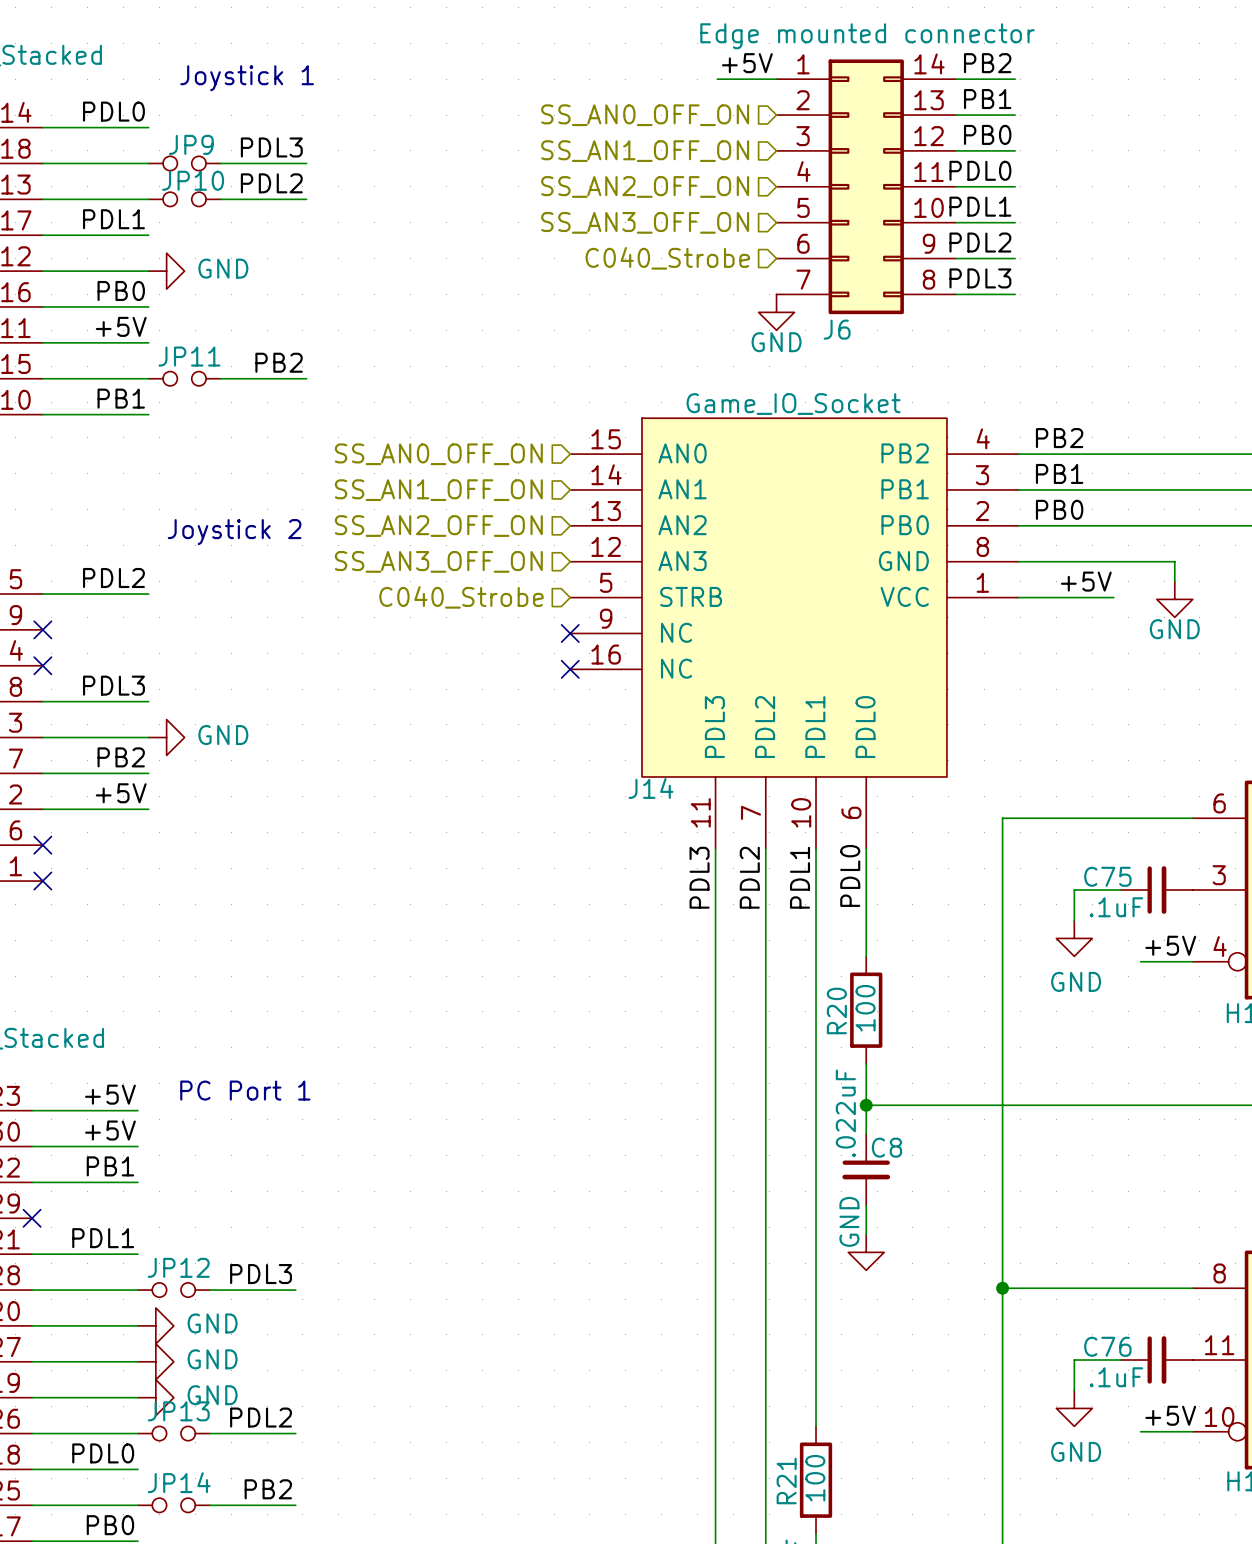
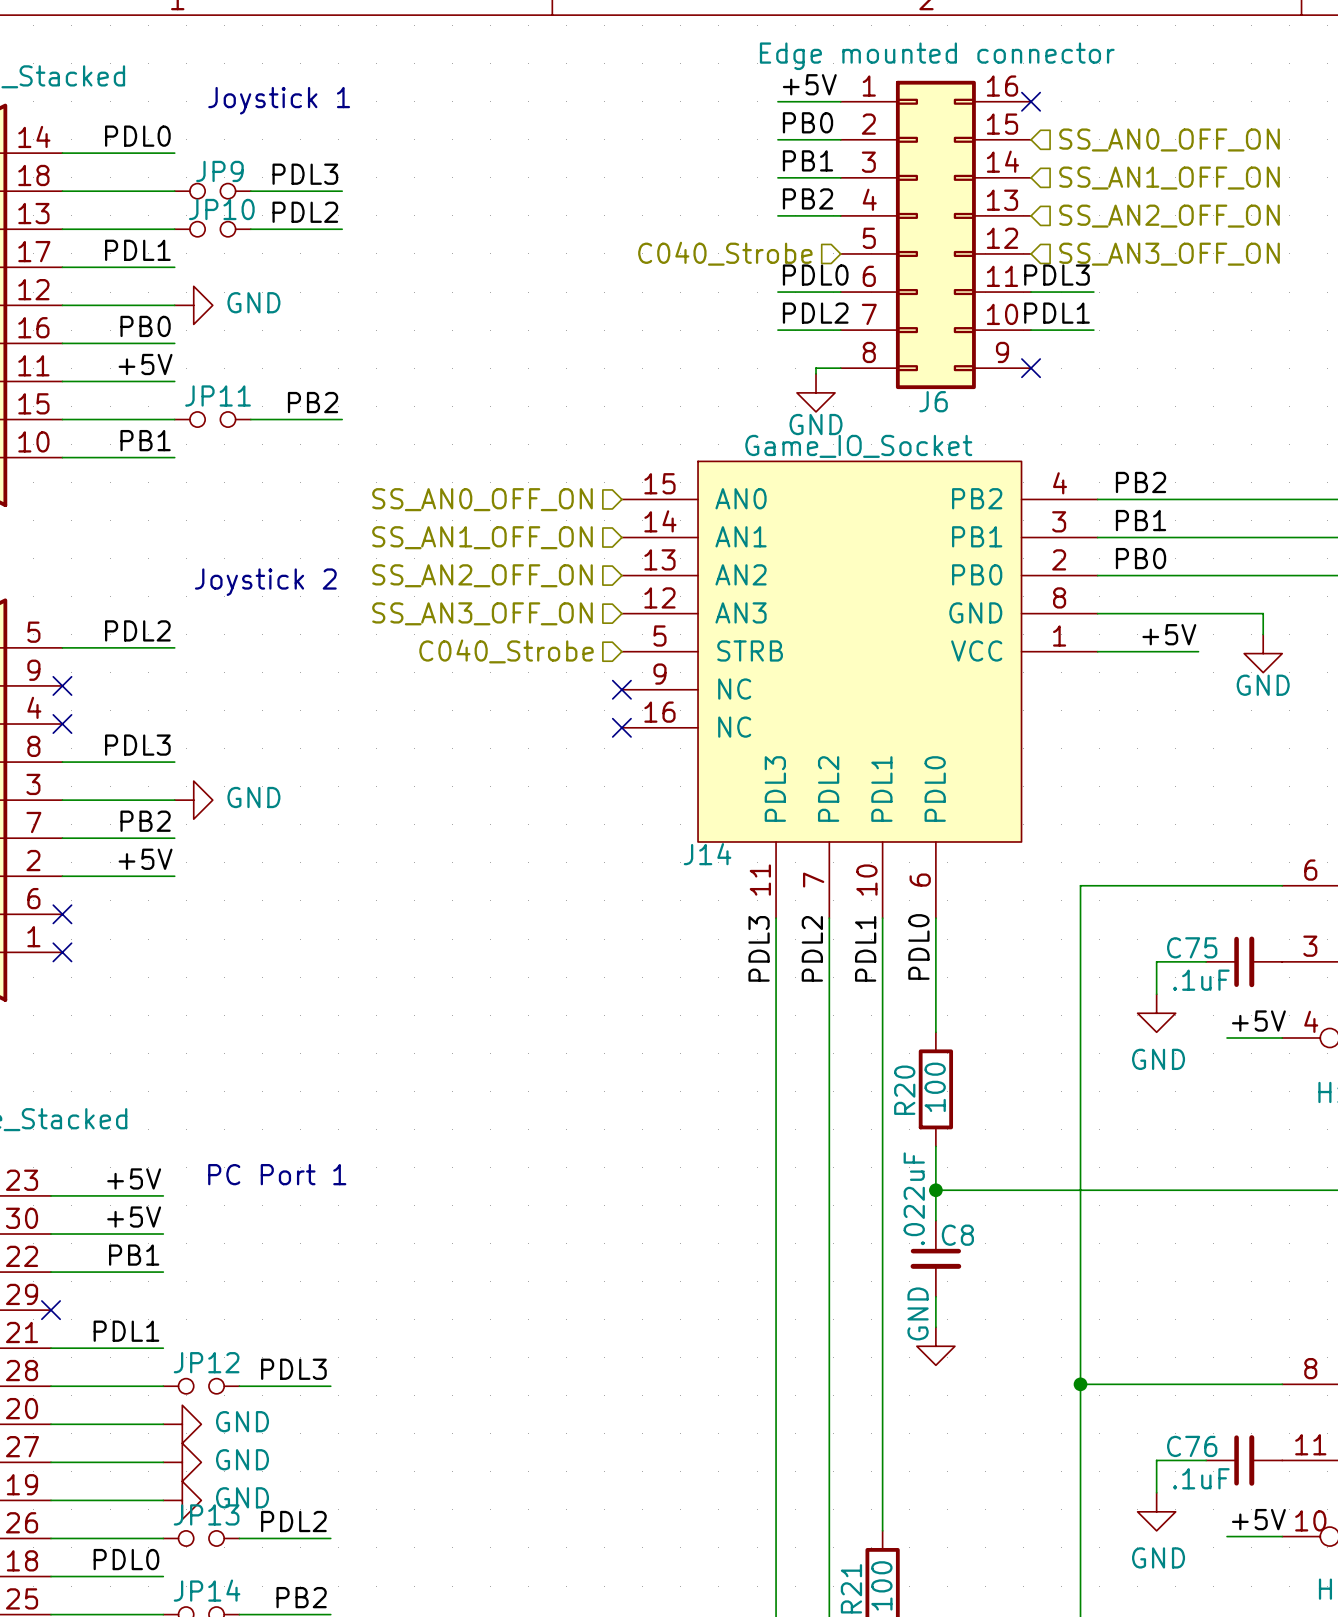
J6 symbol: [776, 59, 956, 315] -> [840, 80, 1032, 390]
label position: PB2 (987, 63) -> PB2 (807, 198)
wire: (955, 79) (1015, 79) -> (777, 139) (840, 139)
no-connect mark: none -> (1031, 101)
label position: PB1 (987, 99) -> PB1 (807, 160)
hierarchical label rotation: 0° (645, 115) -> 180° (1169, 139)
hierarchical label position: SS_AN0_OFF_ON (645, 115) -> SS_AN0_OFF_ON (1169, 139)
wire: (955, 115) (1015, 115) -> (777, 177) (840, 177)
label position: PB0 (987, 134) -> PB0 (807, 122)
wire: (955, 150) (1015, 150) -> (777, 215) (840, 215)
hierarchical label rotation: 0° (645, 151) -> 180° (1169, 178)
hierarchical label position: SS_AN1_OFF_ON (645, 151) -> SS_AN1_OFF_ON (1169, 178)
label position: PDL0 (980, 170) -> PDL0 (815, 275)
hierarchical label rotation: 0° (645, 186) -> 180° (1169, 216)
hierarchical label position: SS_AN2_OFF_ON (645, 186) -> SS_AN2_OFF_ON (1169, 216)
wire: (955, 186) (1015, 186) -> (777, 330) (840, 330)
label: PDL1 (980, 206) -> none
hierarchical label: SS_AN3_OFF_ON (645, 222) -> C040_Strobe (725, 253)
wire: (955, 222) (1015, 222) -> (777, 292) (840, 292)
hierarchical label: none -> SS_AN3_OFF_ON (1169, 254)
label: PDL2 (980, 242) -> PDL3 (1056, 275)
hierarchical label: C040_Strobe (667, 258) -> none
label: none -> PDL2 (815, 313)
label: PDL3 (980, 278) -> PDL1 (1056, 313)
power symbol position: GND (776, 312) -> GND (816, 392)
J6 name position: J6 (837, 329) -> J6 (933, 401)
wire: none -> (840, 368) (816, 368) (816, 373)
no-connect mark: none -> (1031, 368)

